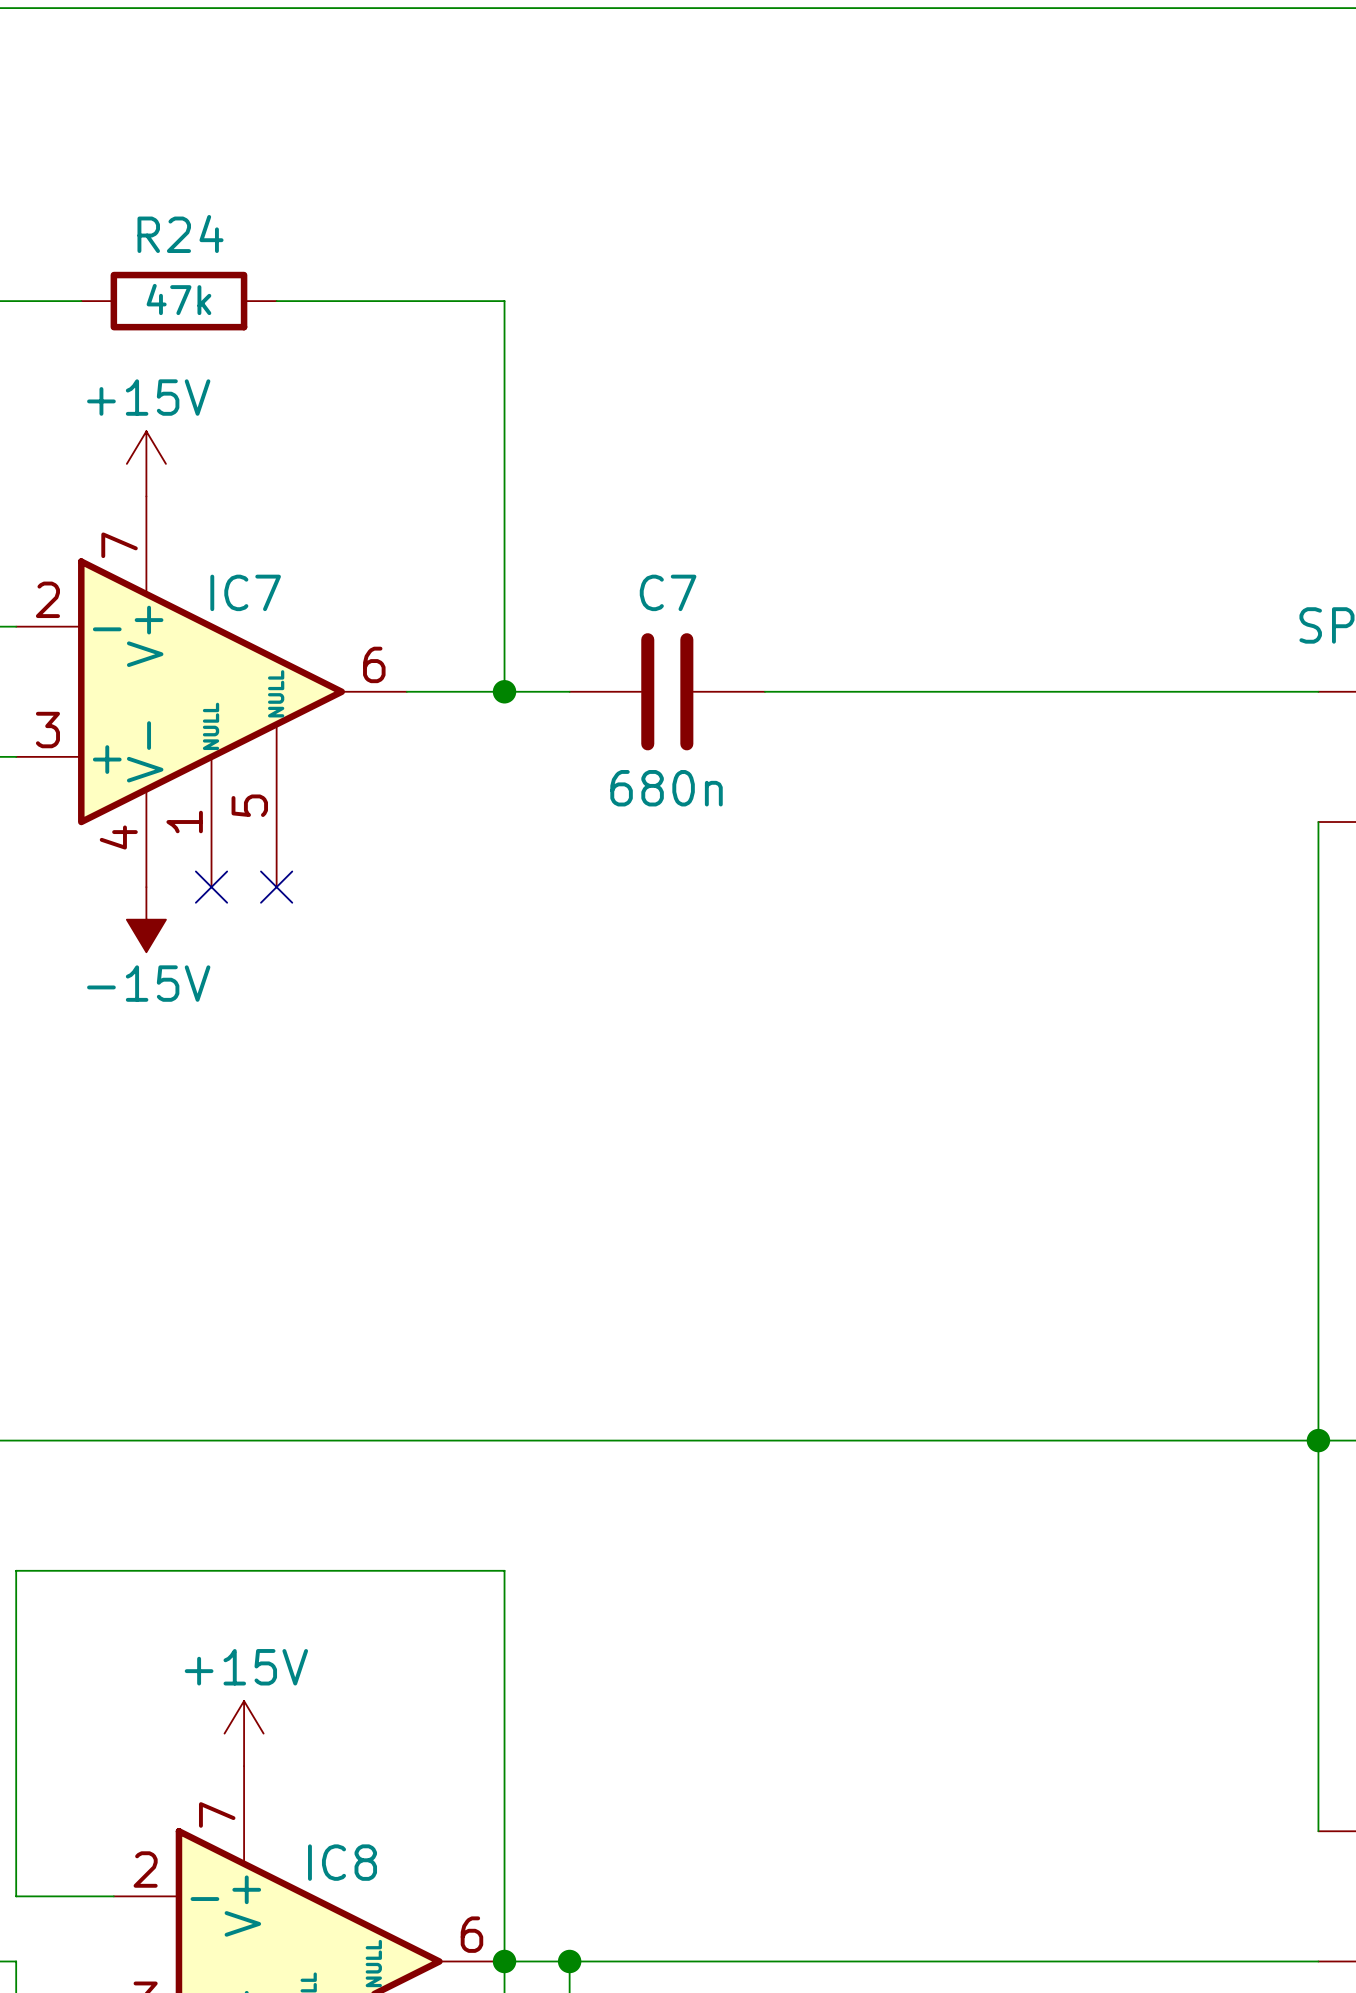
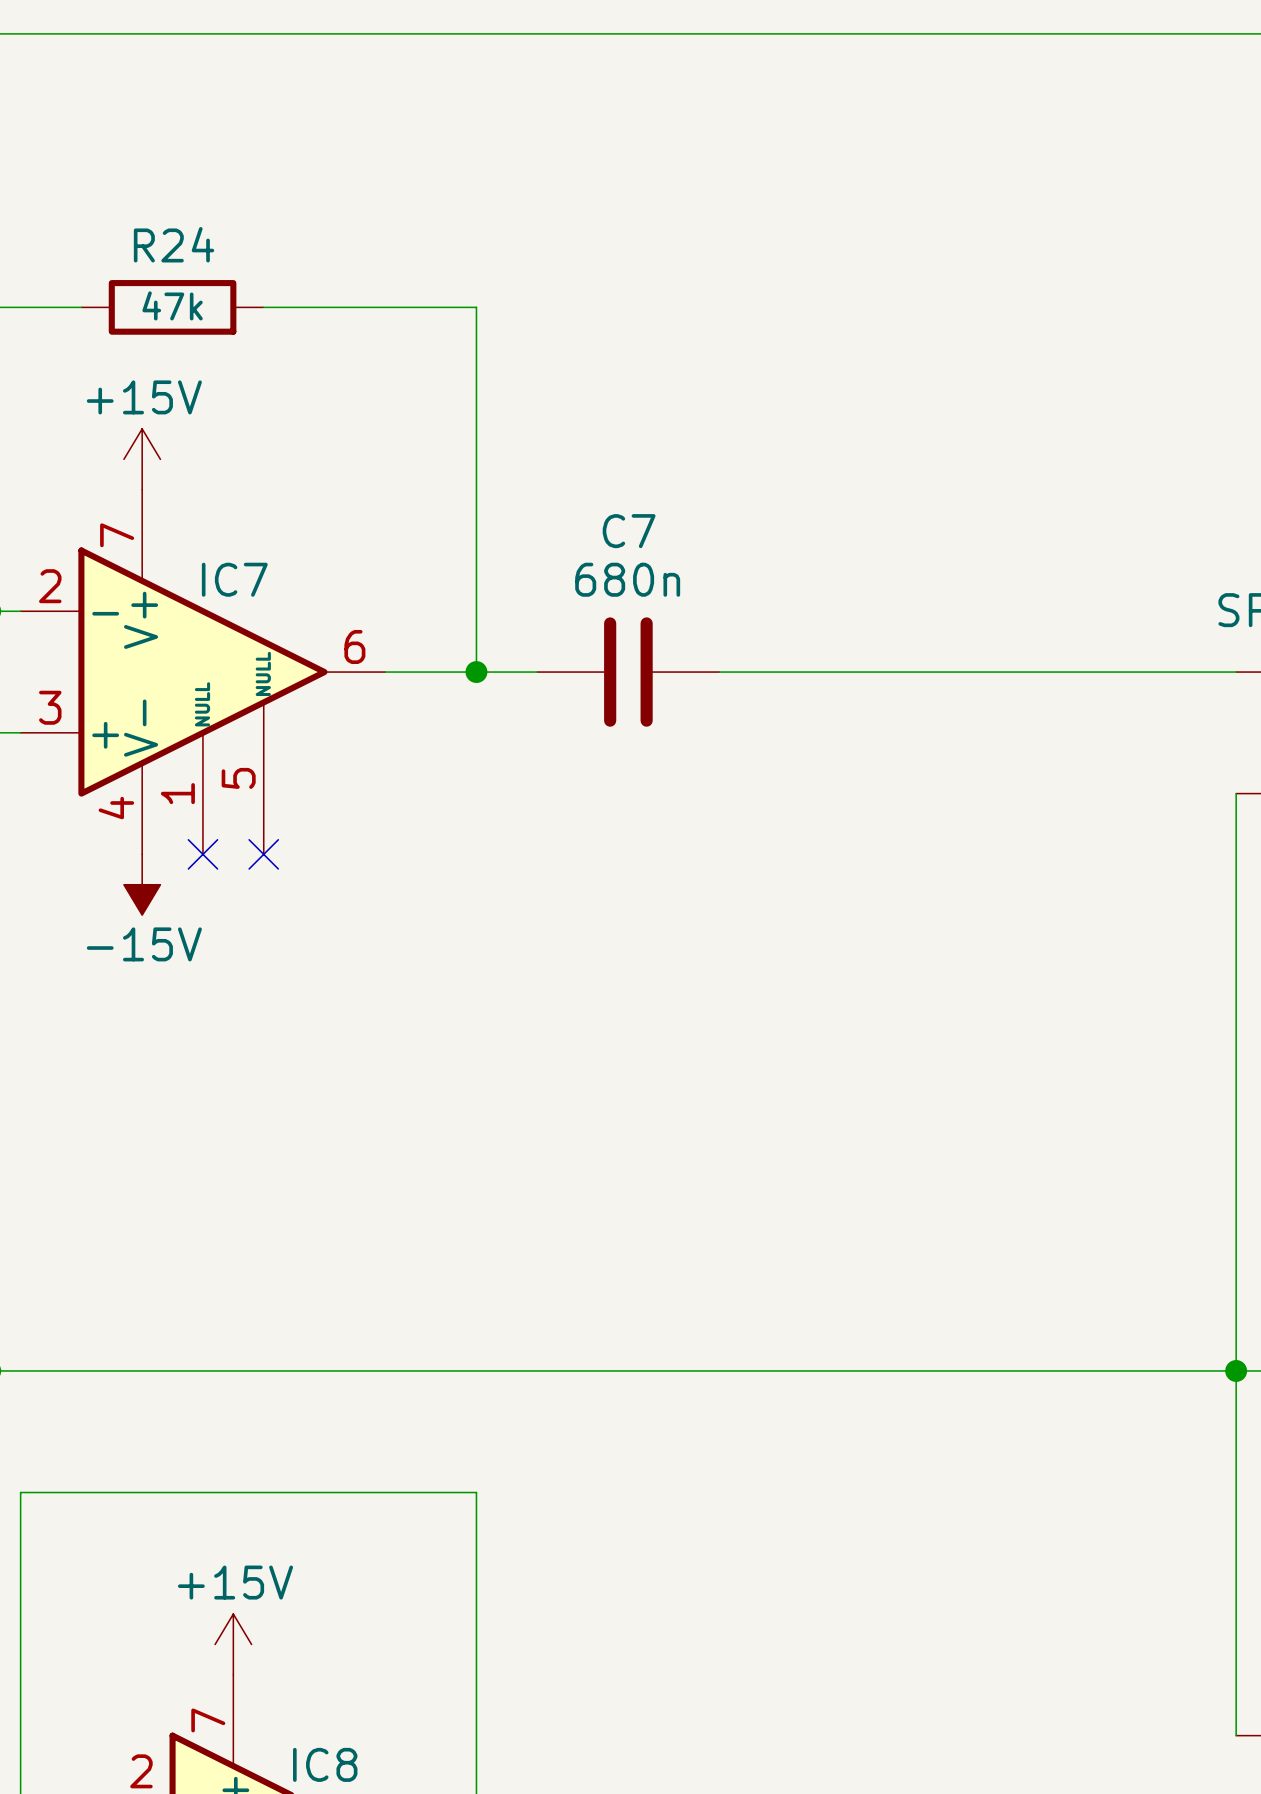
C7 name position: C7 (668, 592) -> C7 (629, 531)
C7 value position: 680n (666, 788) -> 680n (627, 579)

